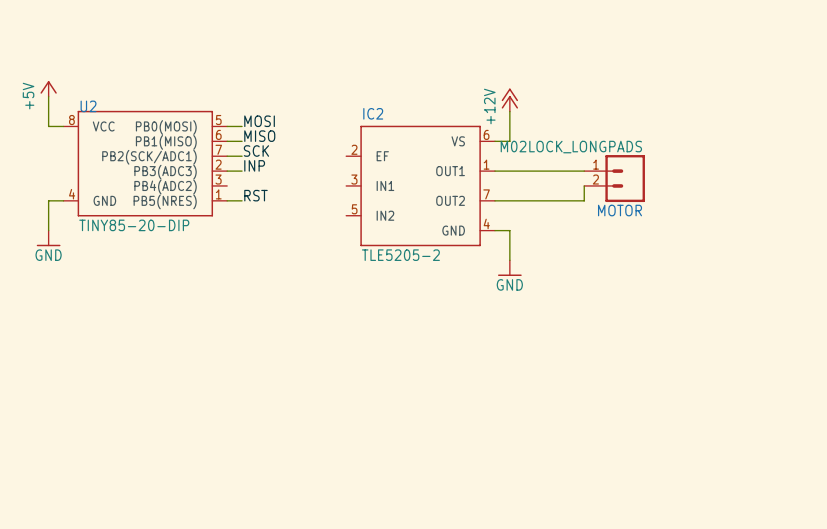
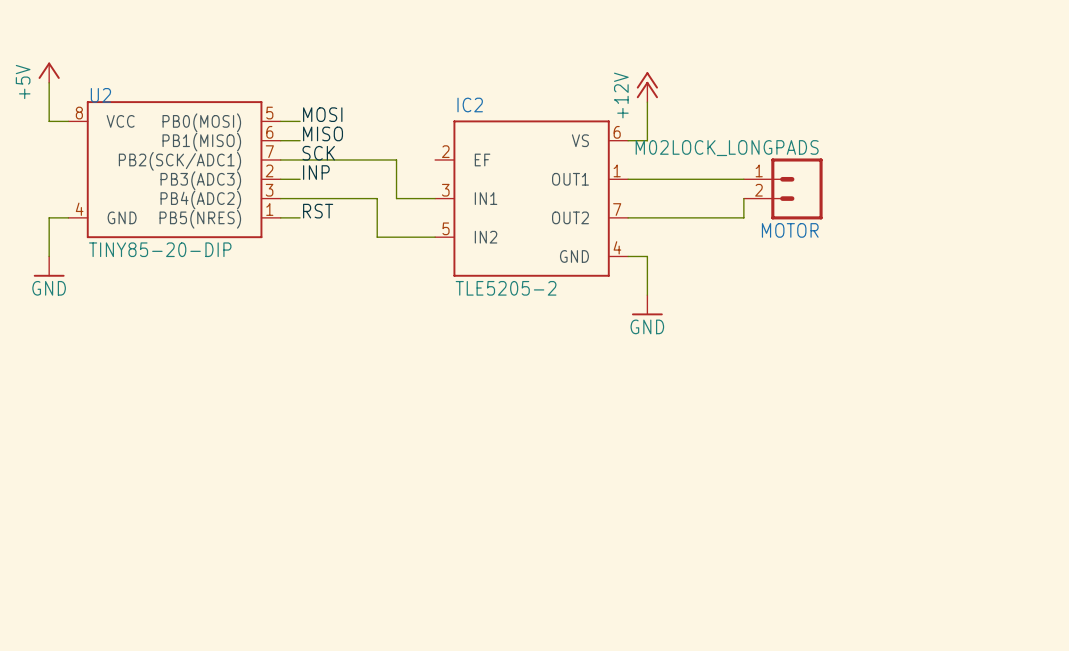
wire: none -> (300, 159) (396, 159) (396, 198) (435, 198)
wire: none -> (280, 198) (377, 198) (377, 237) (435, 237)

